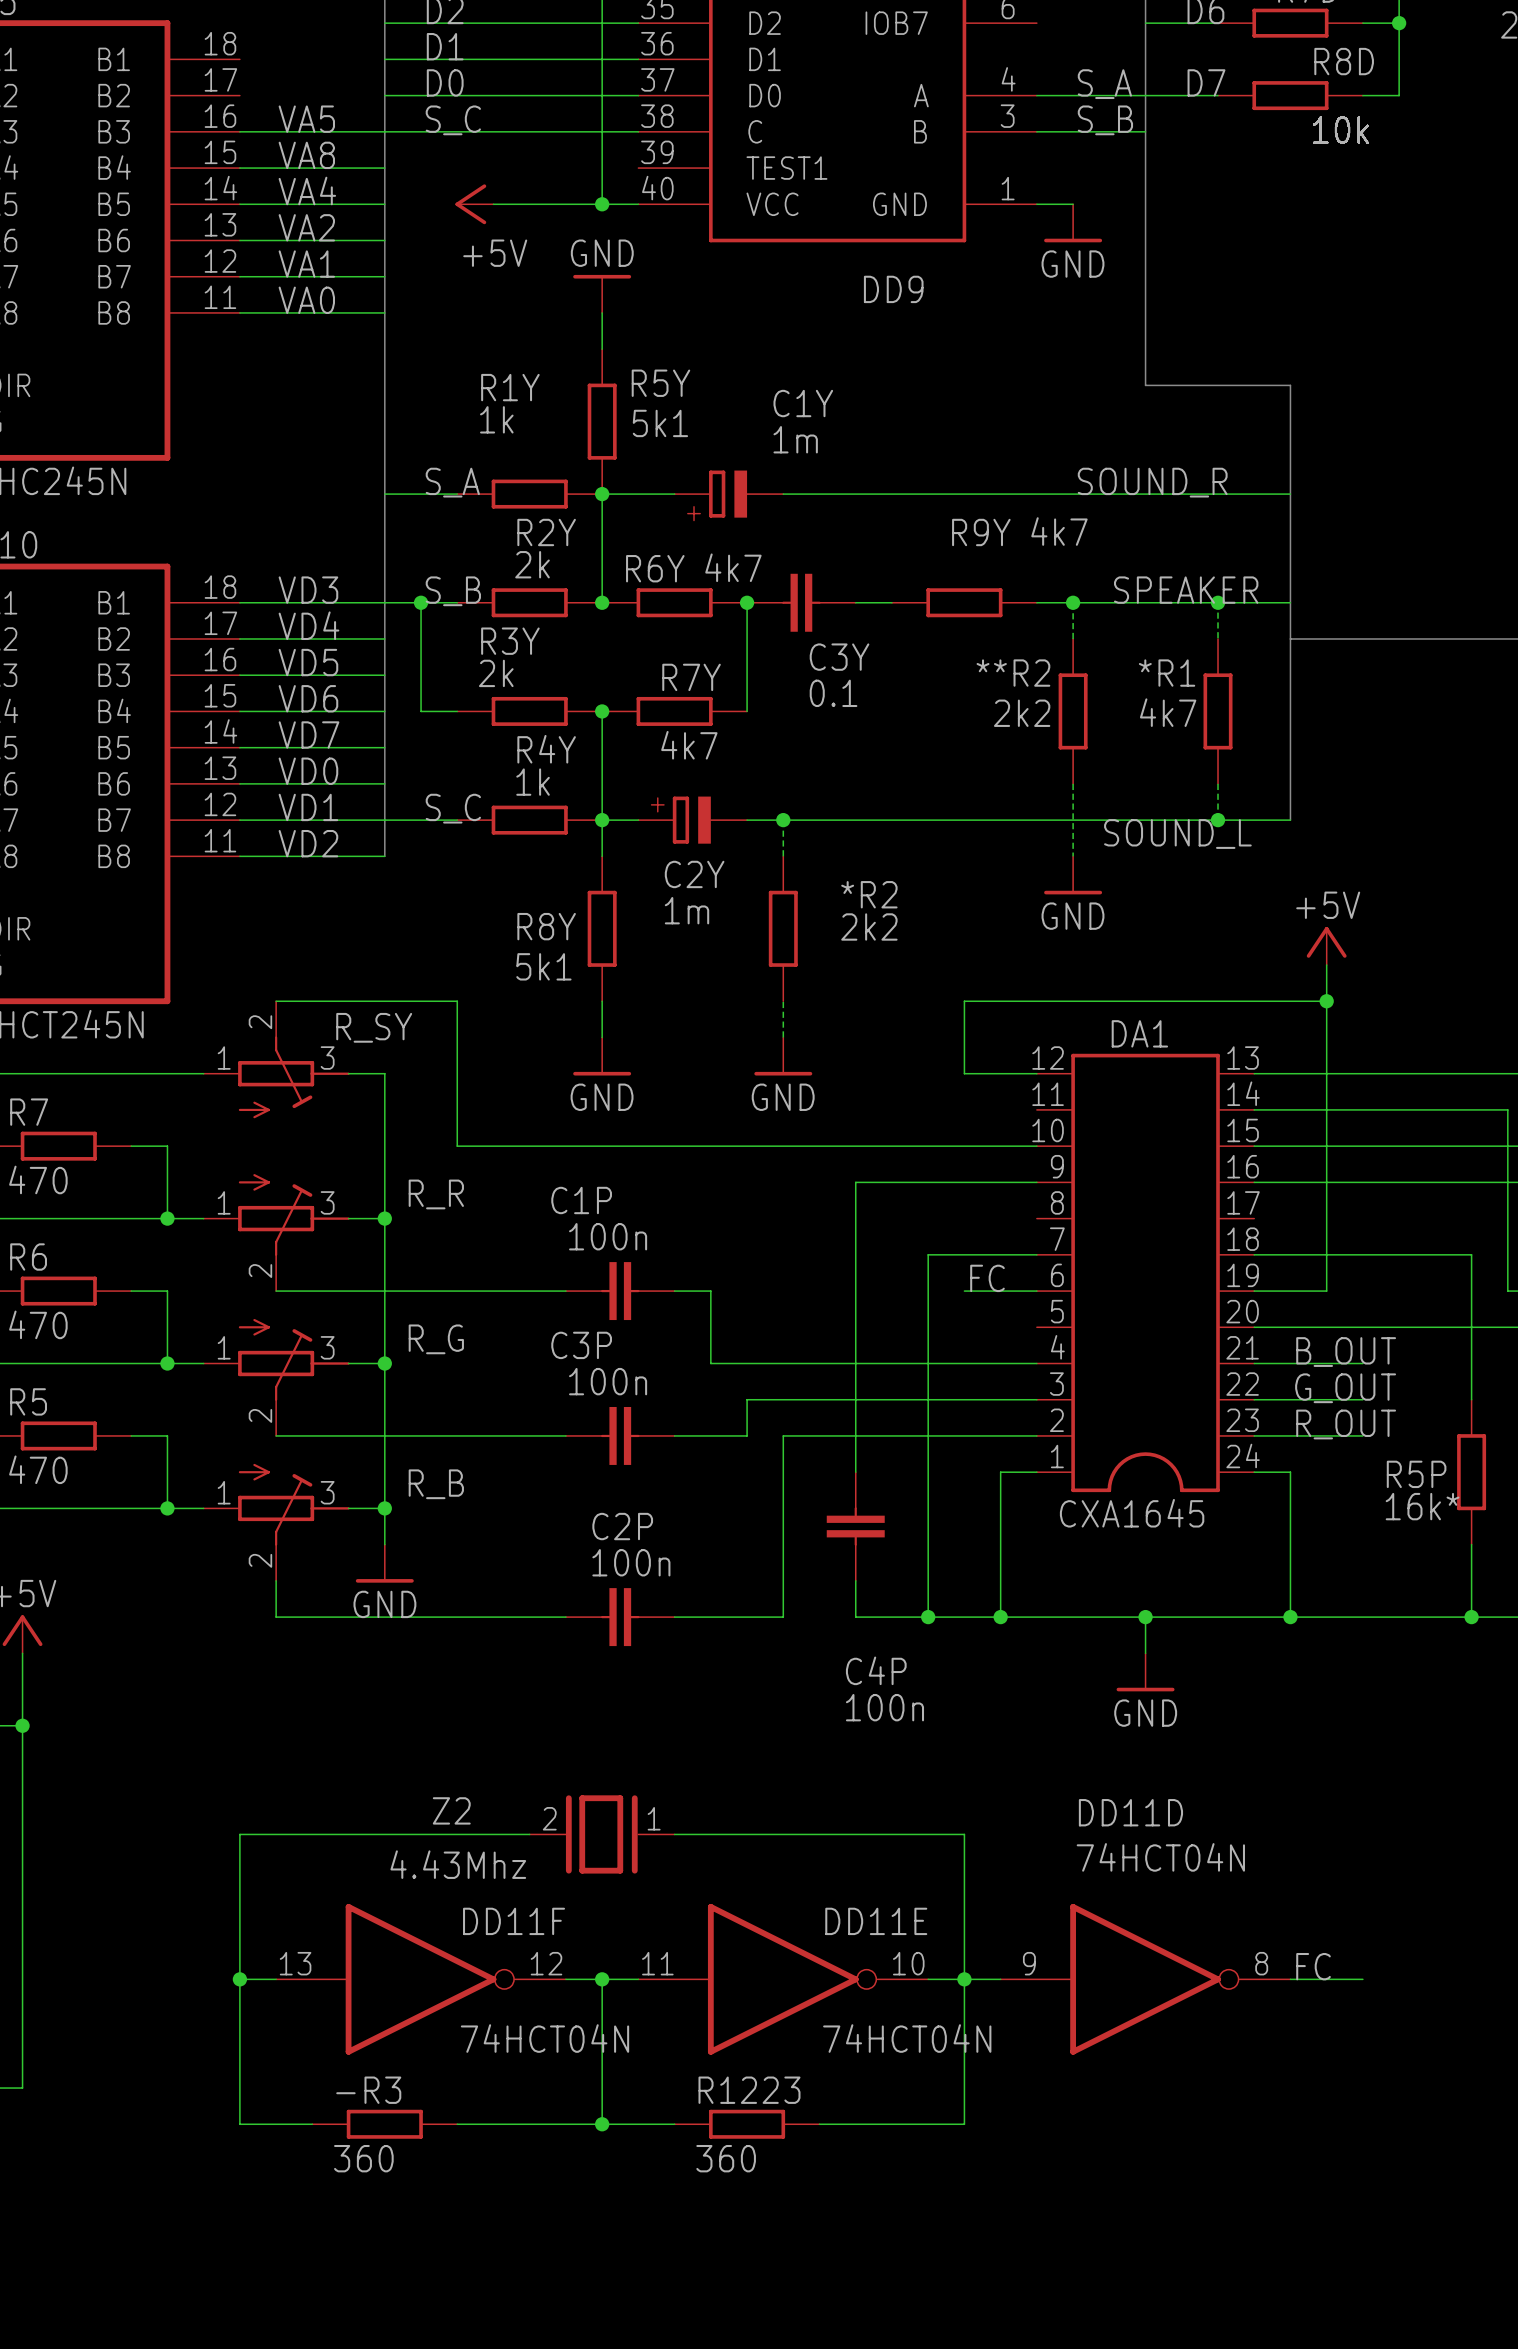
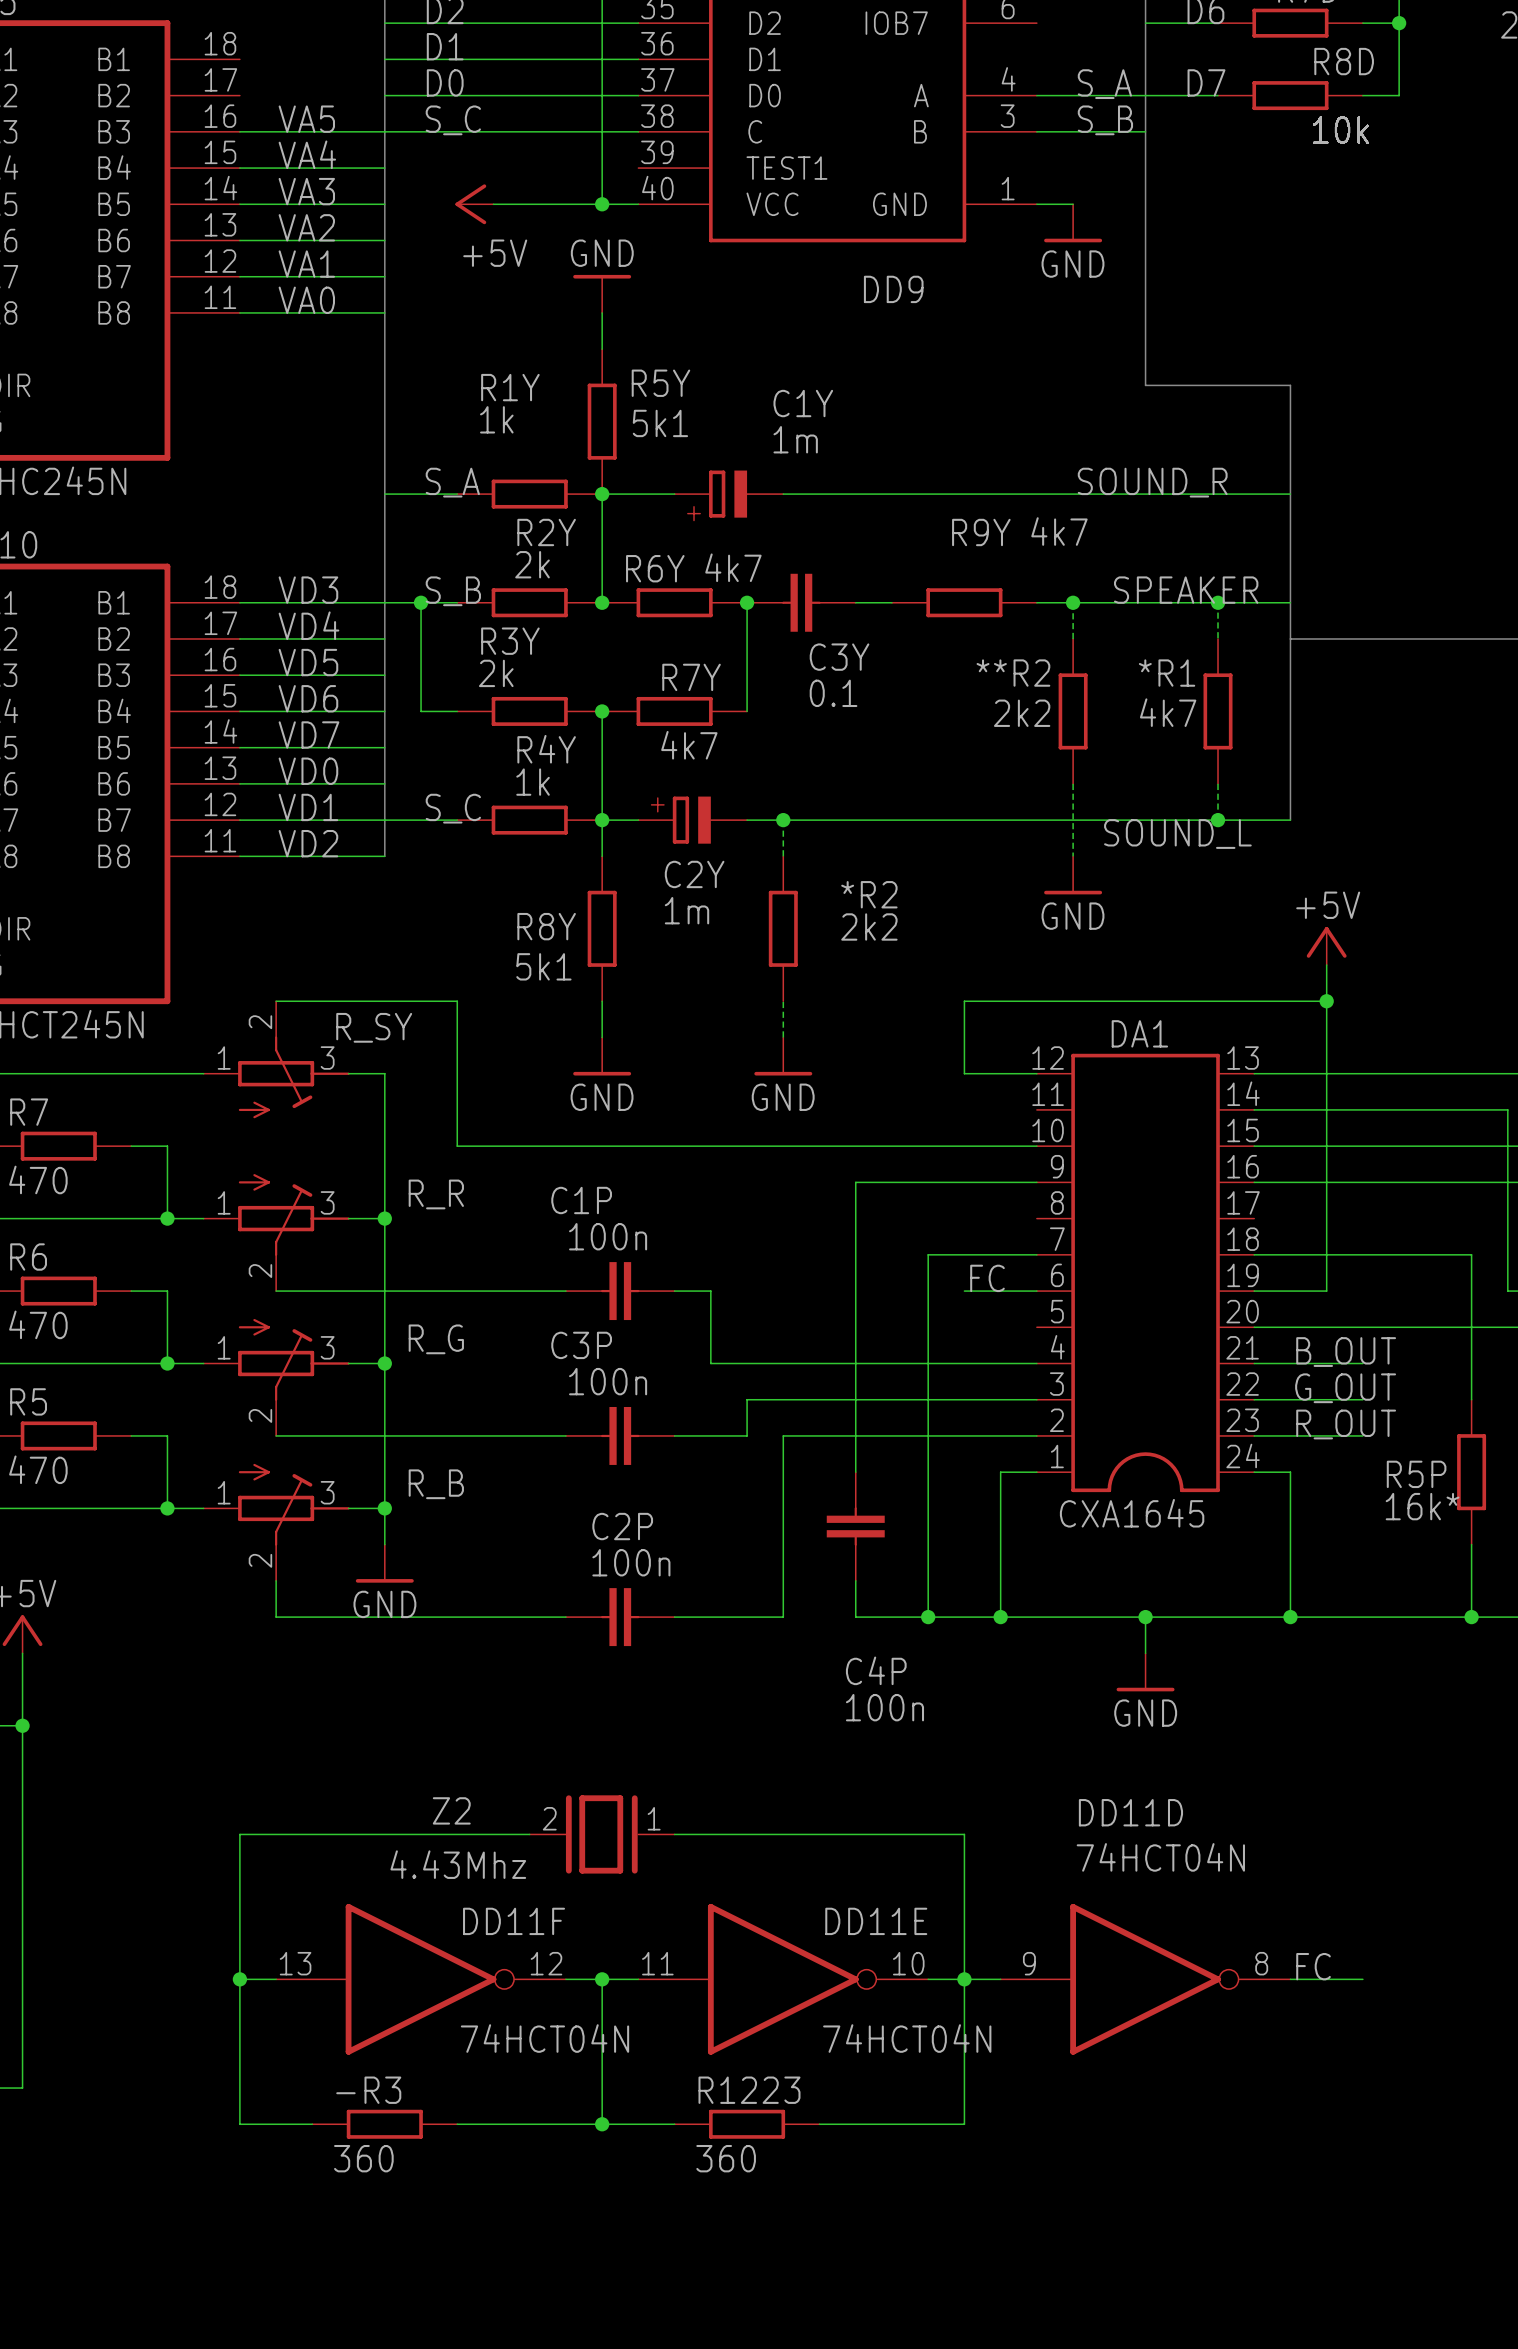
label: VA8 (306, 155) -> VA4 (307, 154)
label: VA4 (307, 191) -> VA3 (306, 191)

